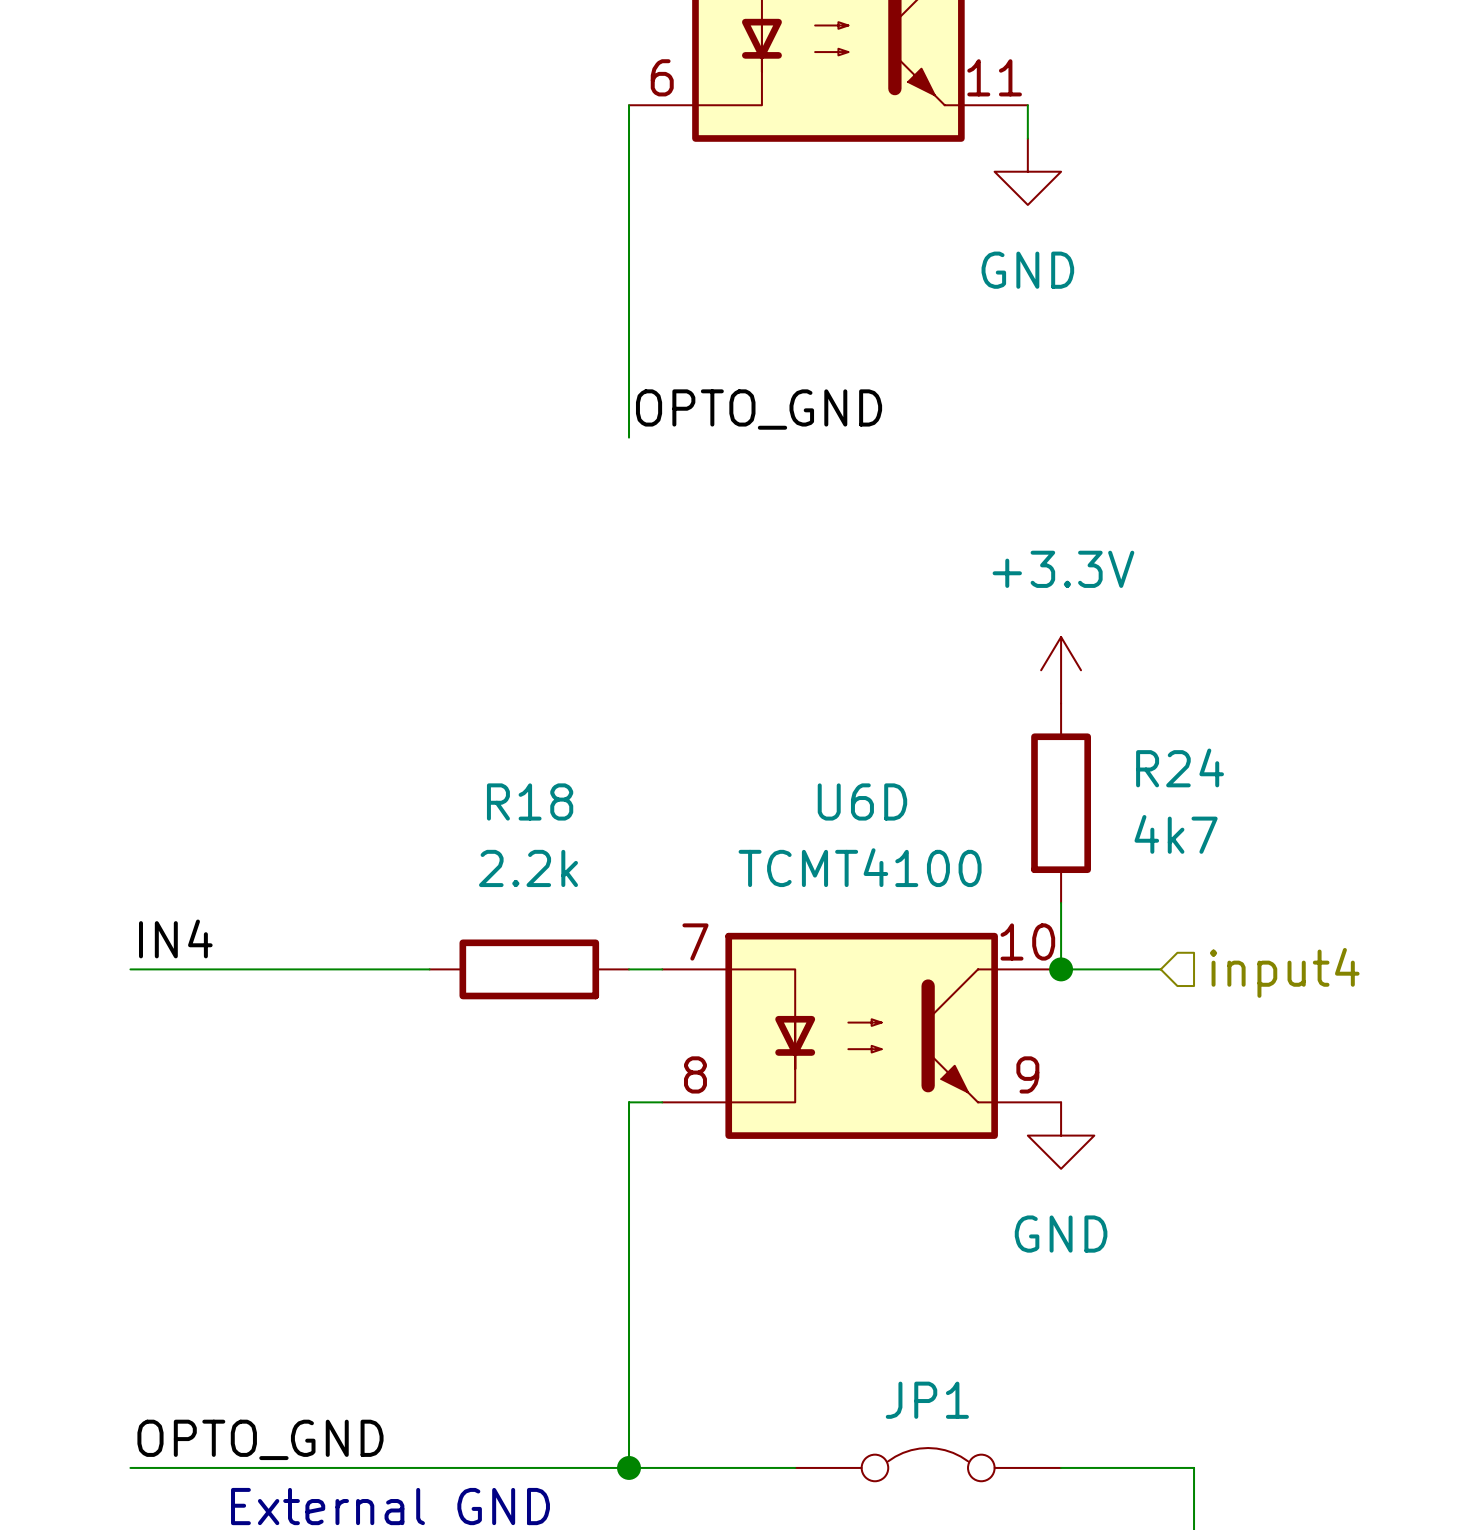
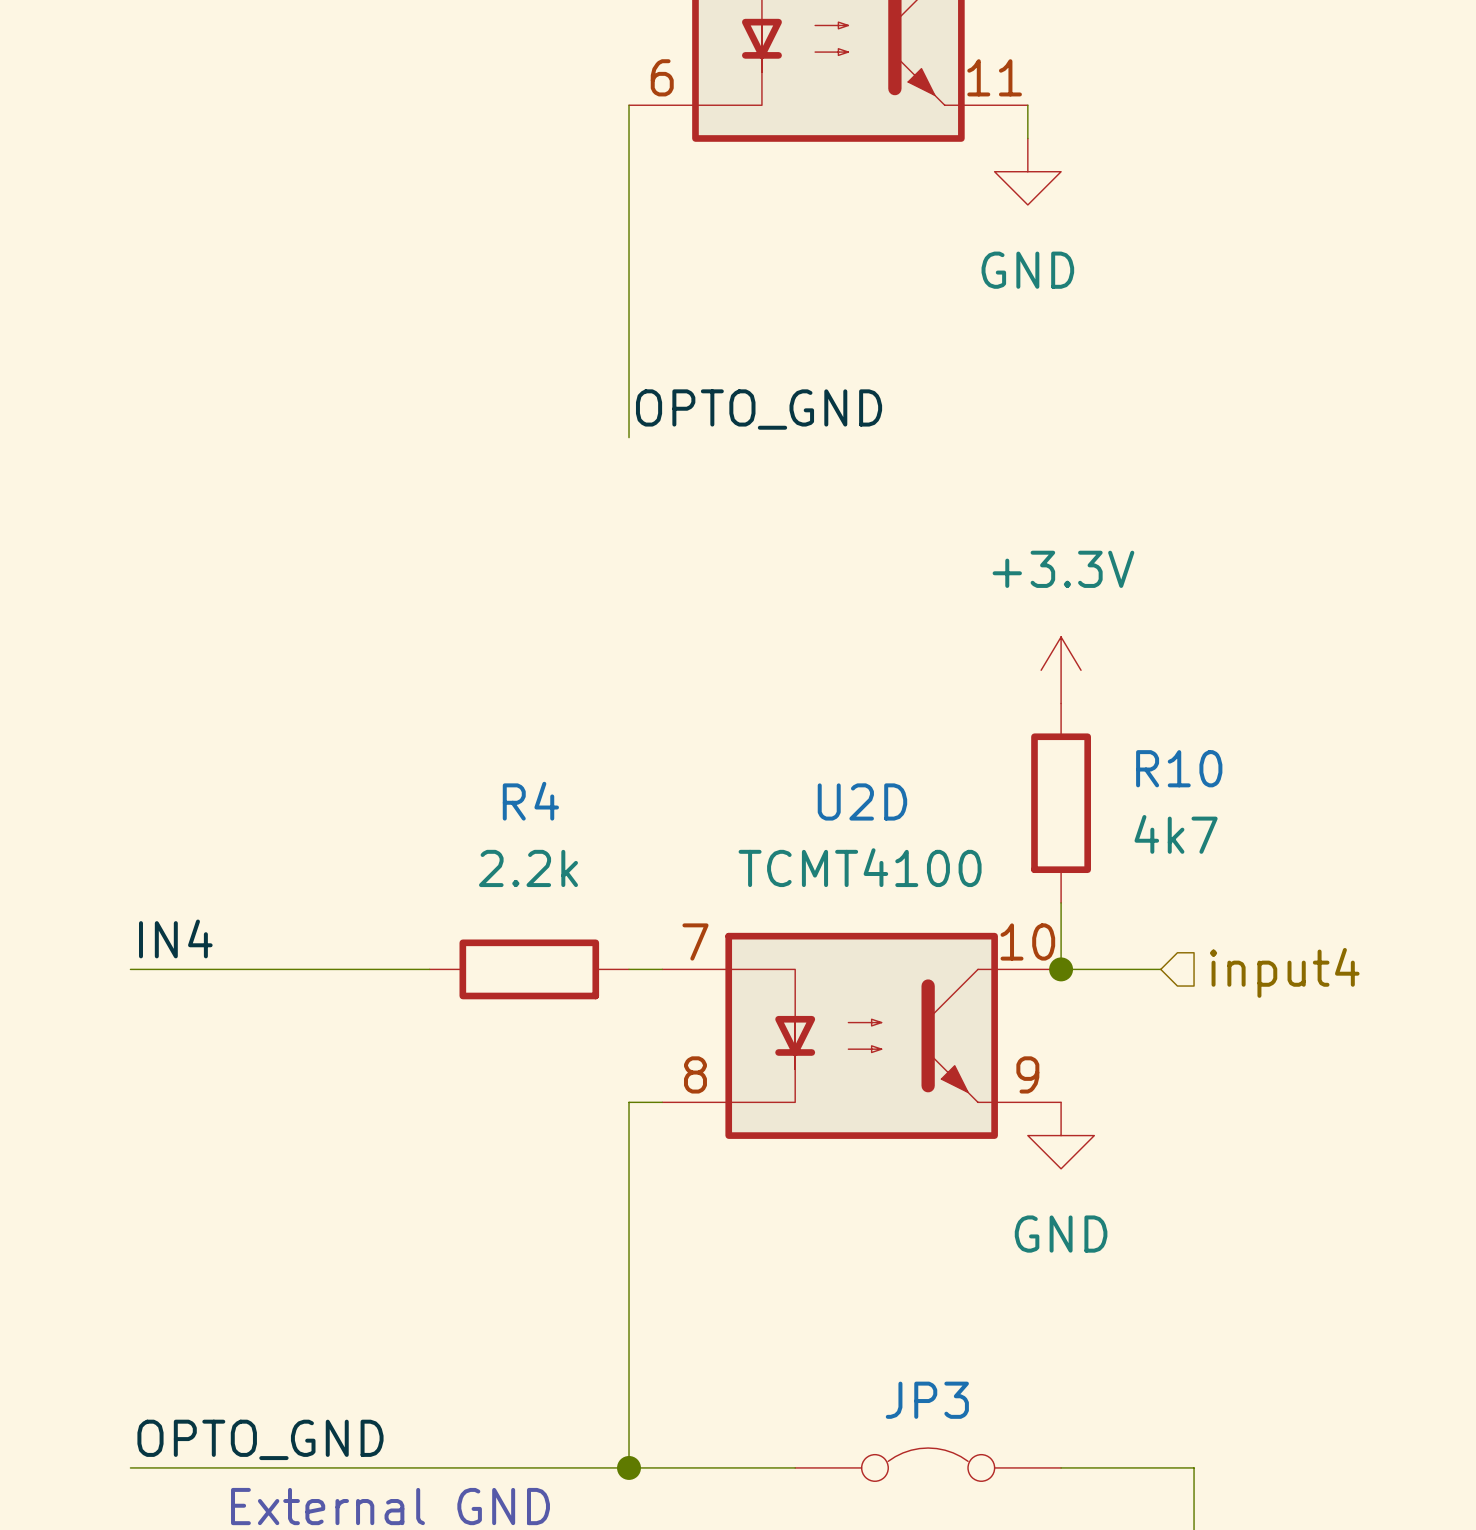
R24 name: R24 (1180, 767) -> R10 (1179, 768)
R18 name: R18 (530, 801) -> R4 (530, 801)
U6D name: U6D (862, 801) -> U2D (862, 801)
JP1 name: JP1 (927, 1400) -> JP3 (927, 1400)

